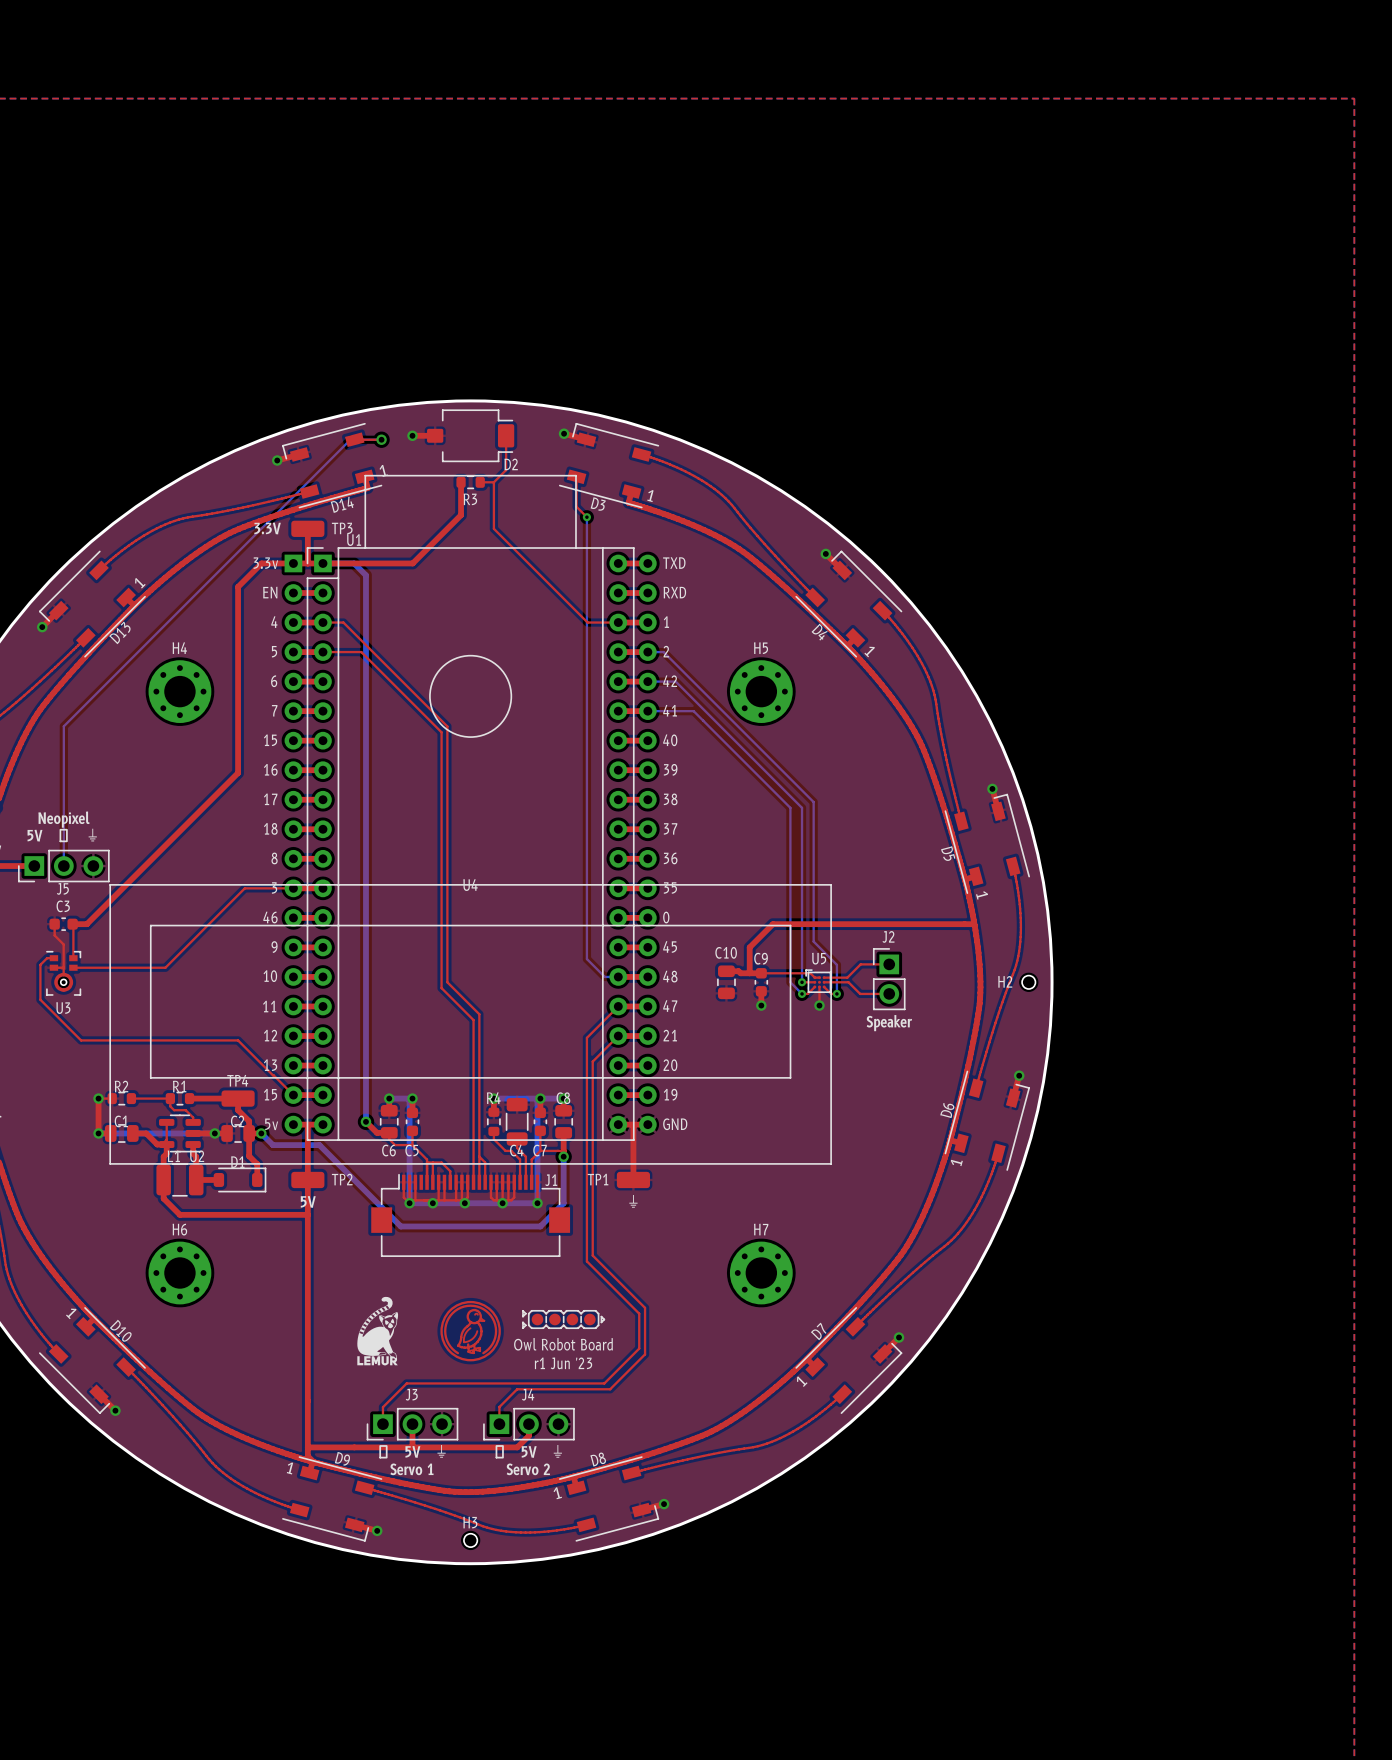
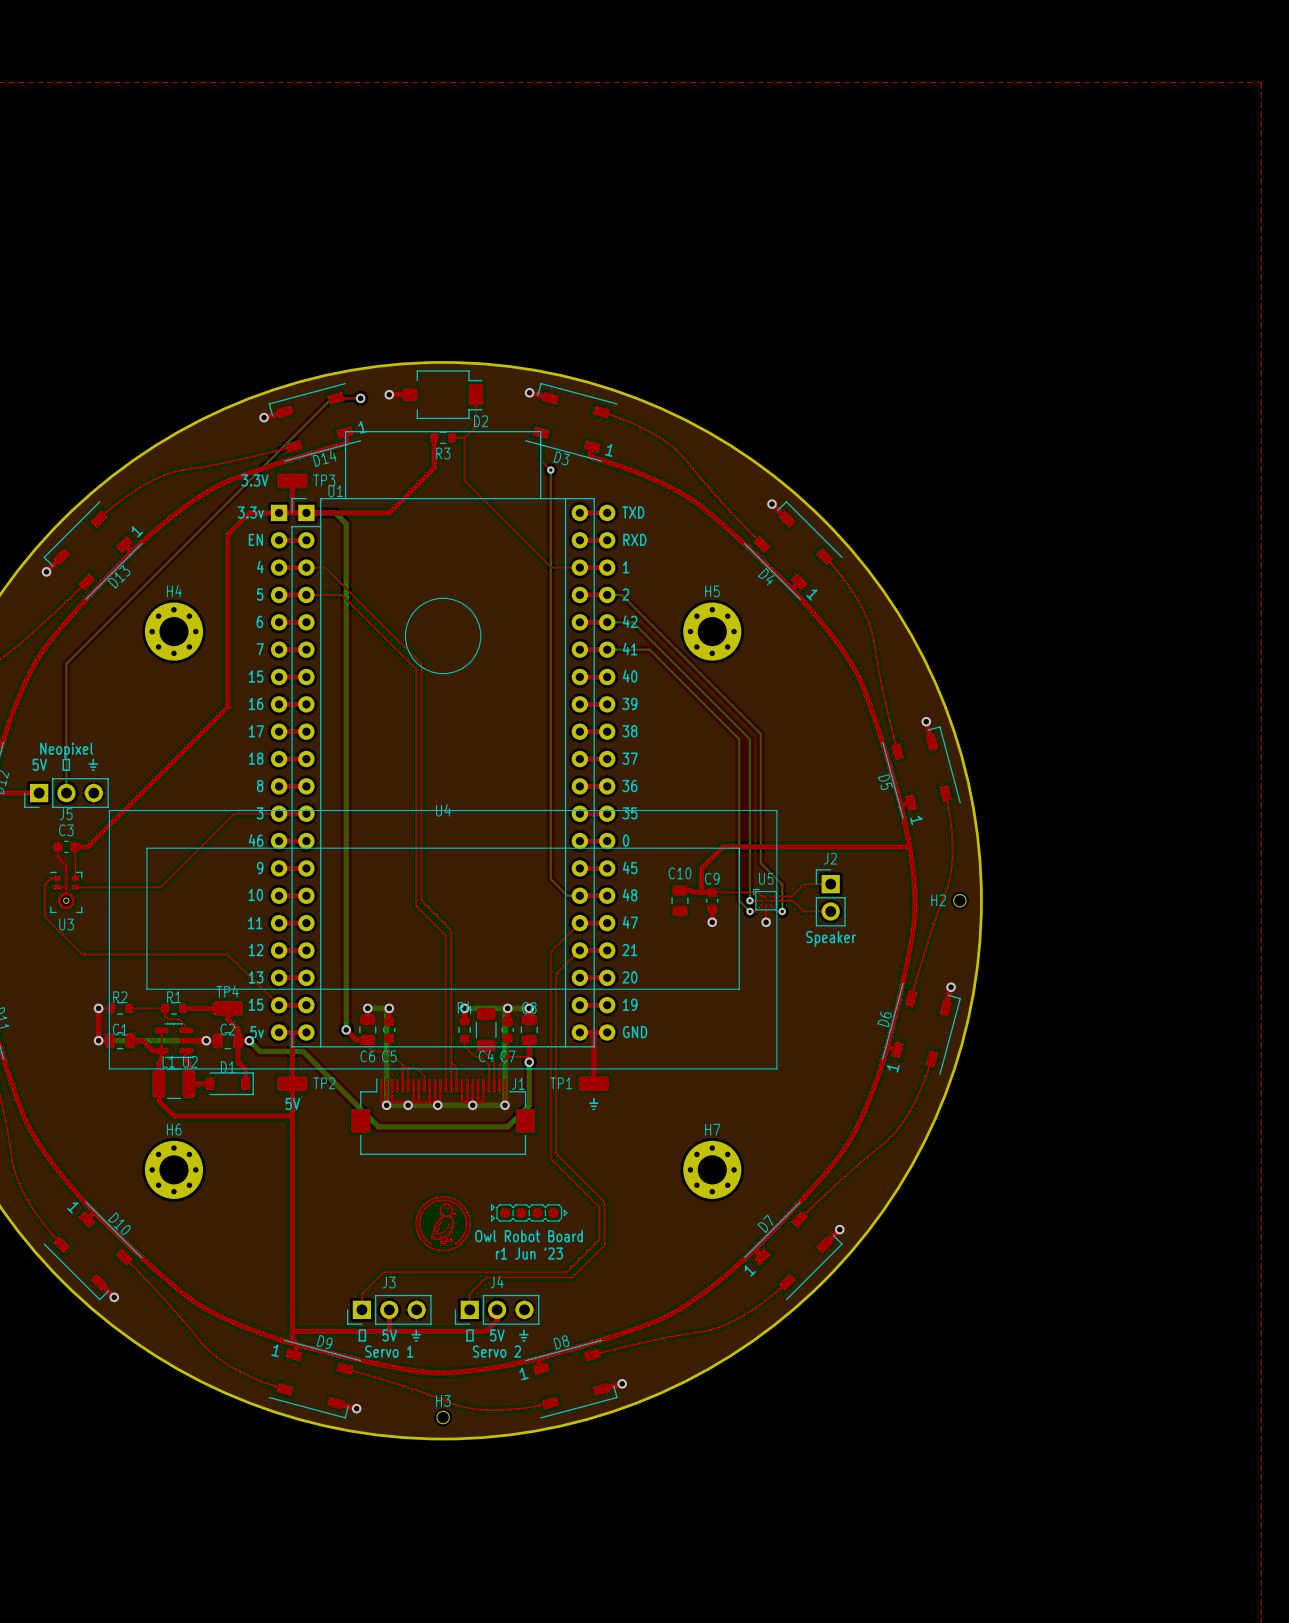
drawing: [357, 1296, 399, 1366] -> none

